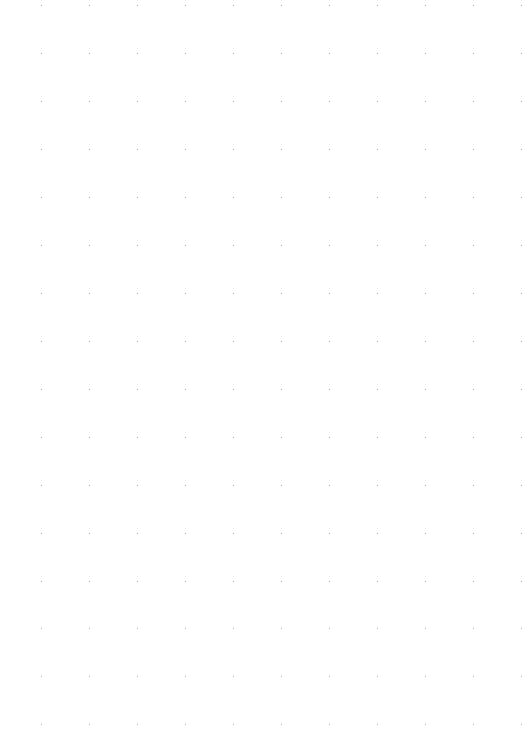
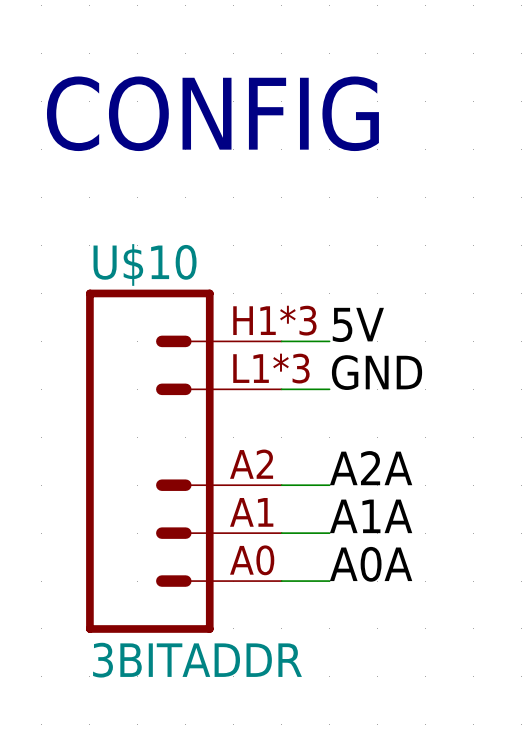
text: none -> CONFIG (212, 113)
label: none -> 5V (358, 324)
wire: none -> (281, 341) (329, 341)
label: none -> GND (377, 372)
wire: none -> (281, 389) (329, 389)
U$10: none -> 3BITADDR (183, 461)
label: none -> A2A (371, 468)
wire: none -> (281, 485) (329, 485)
label: none -> A1A (371, 516)
wire: none -> (281, 533) (329, 533)
label: none -> A0A (371, 564)
wire: none -> (281, 581) (329, 581)

